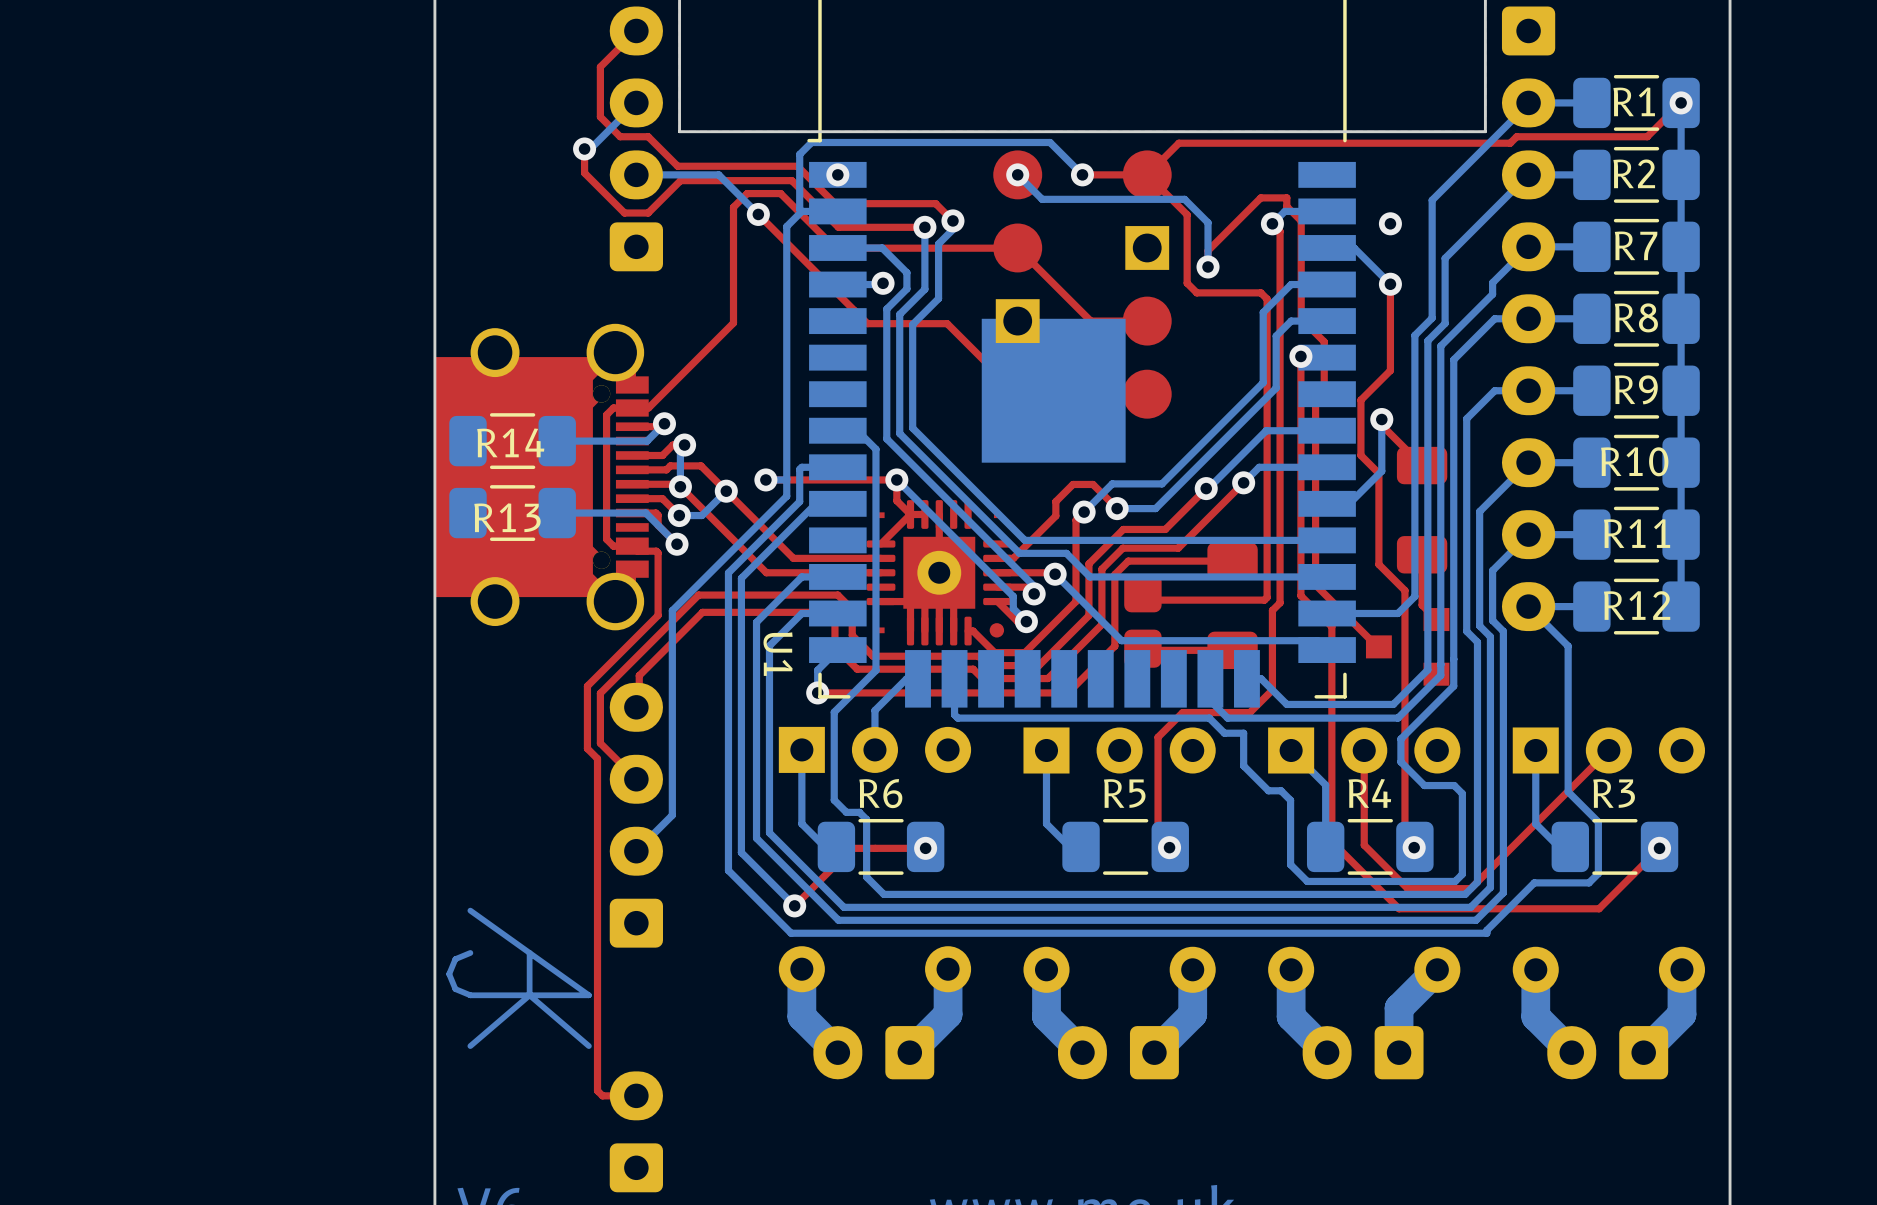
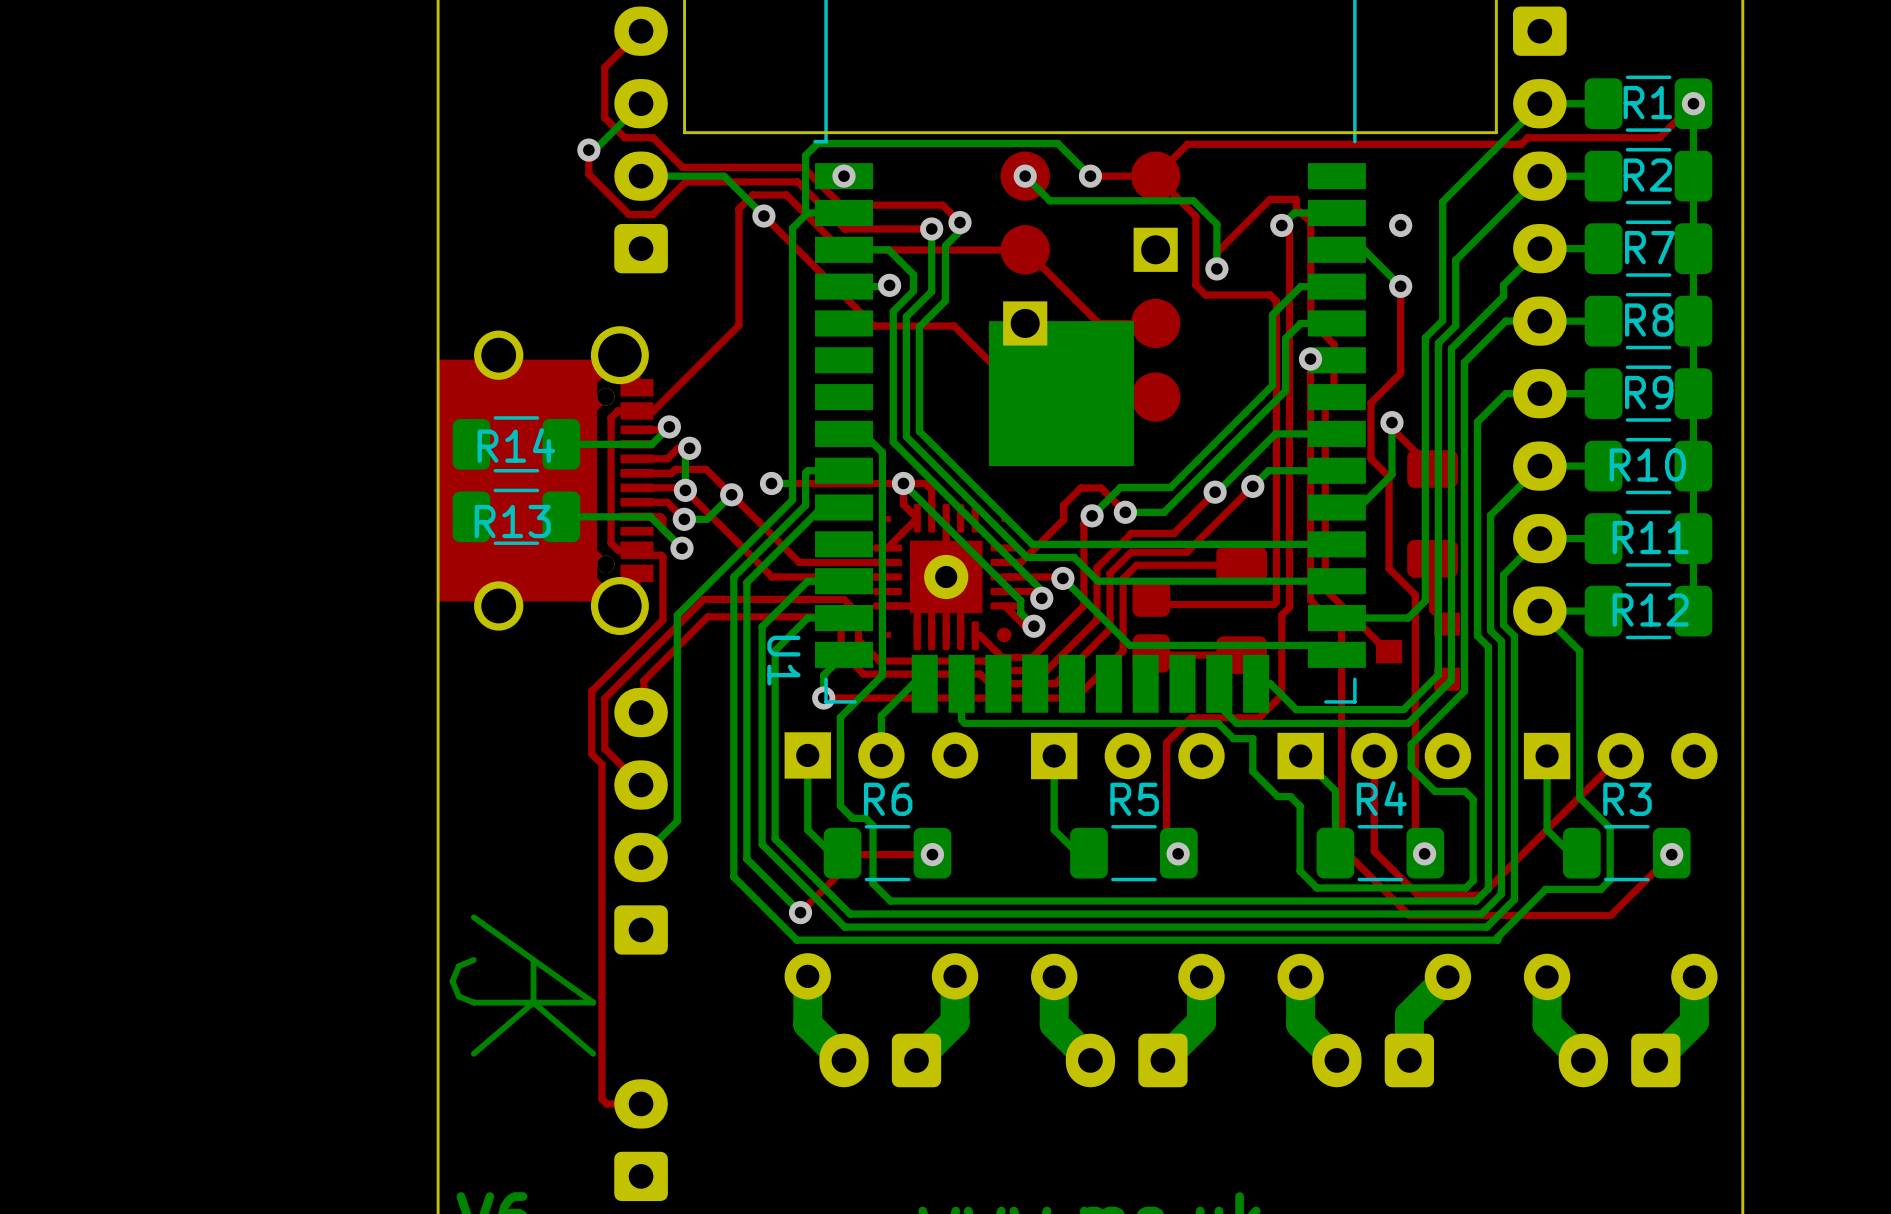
top track: (924, 514) (910, 514) -> (931, 518) (931, 490) (925, 483) (903, 483)

